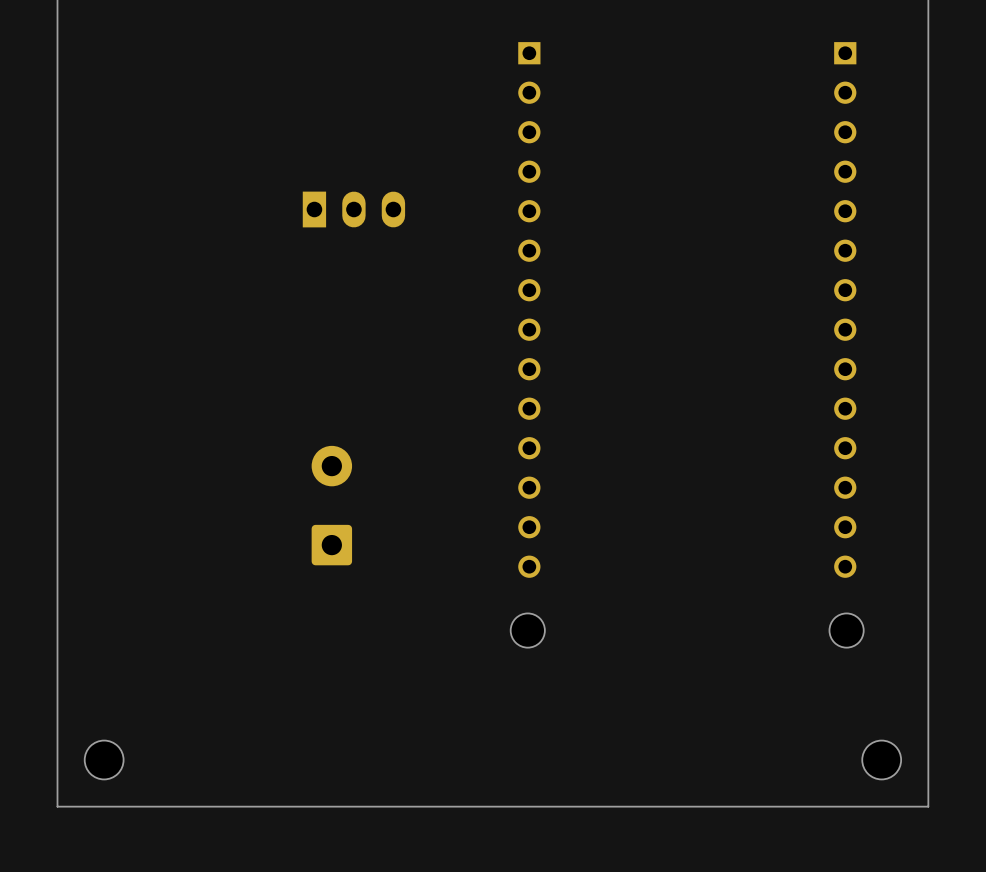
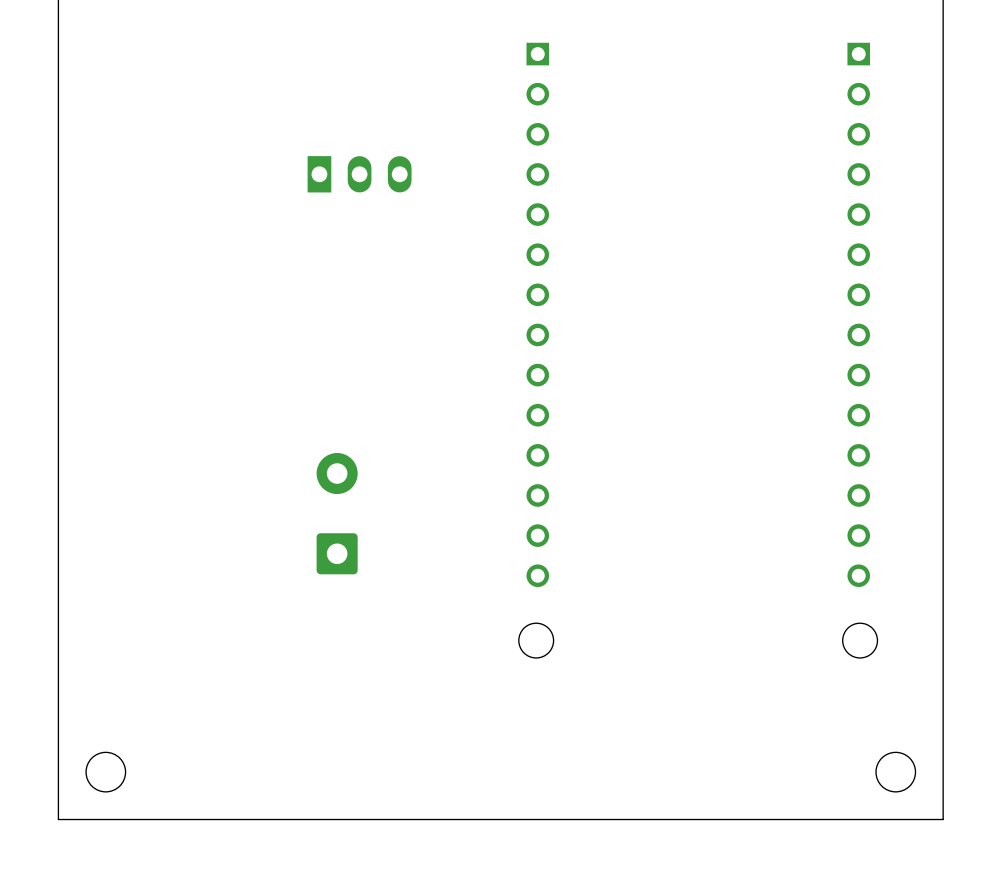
part position: (353, 209) -> (359, 174)

